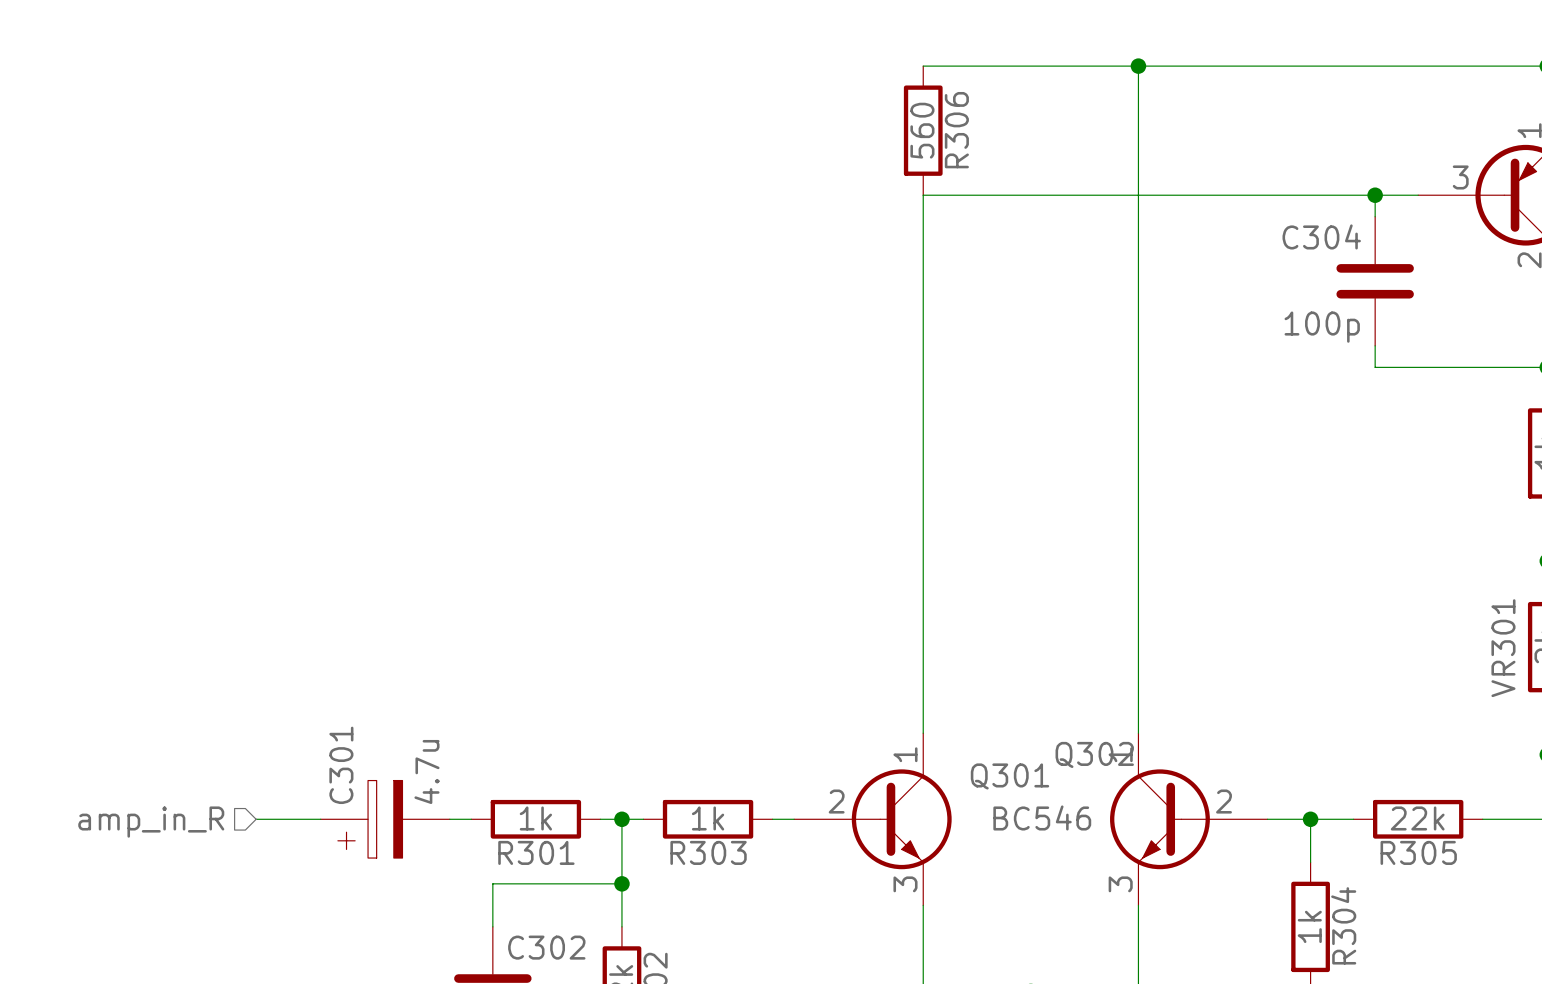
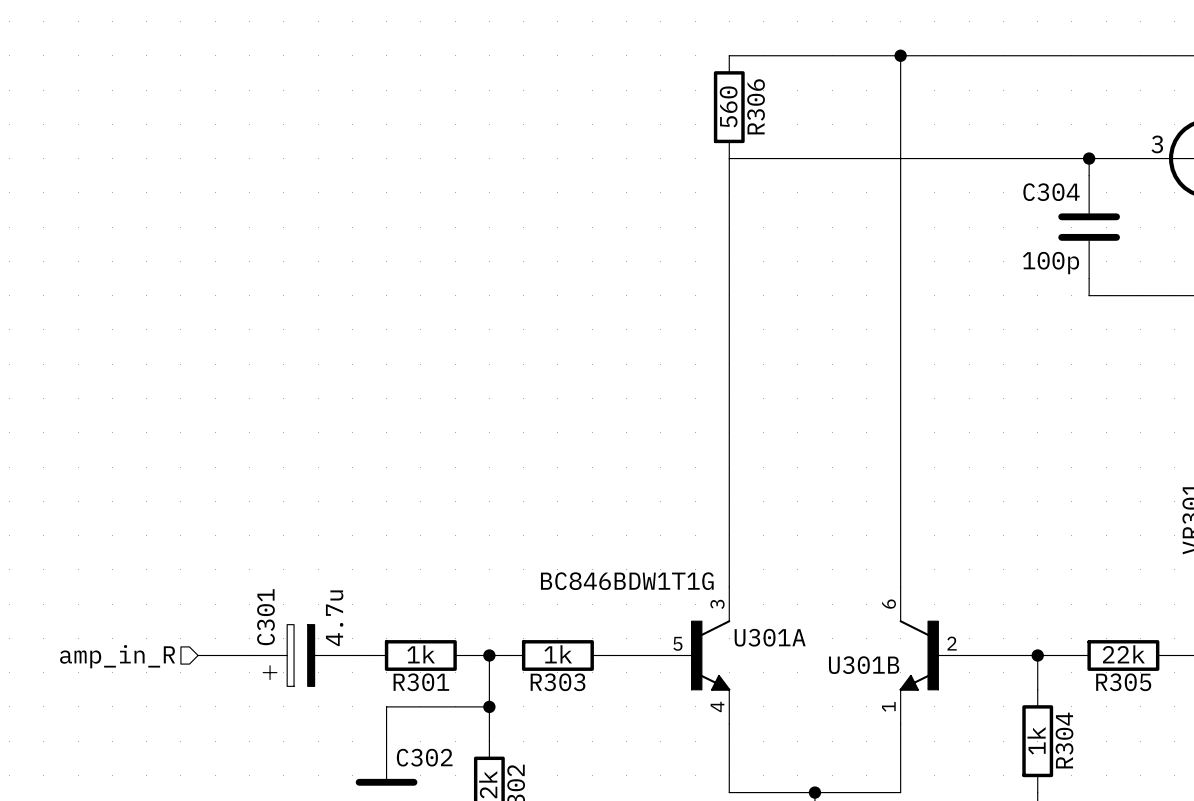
Q301: BC546 (872, 819) -> none
U301A: none -> (695, 655)
U301B: none -> BC846BDW1T1G (934, 655)
Q302: (1188, 819) -> none

